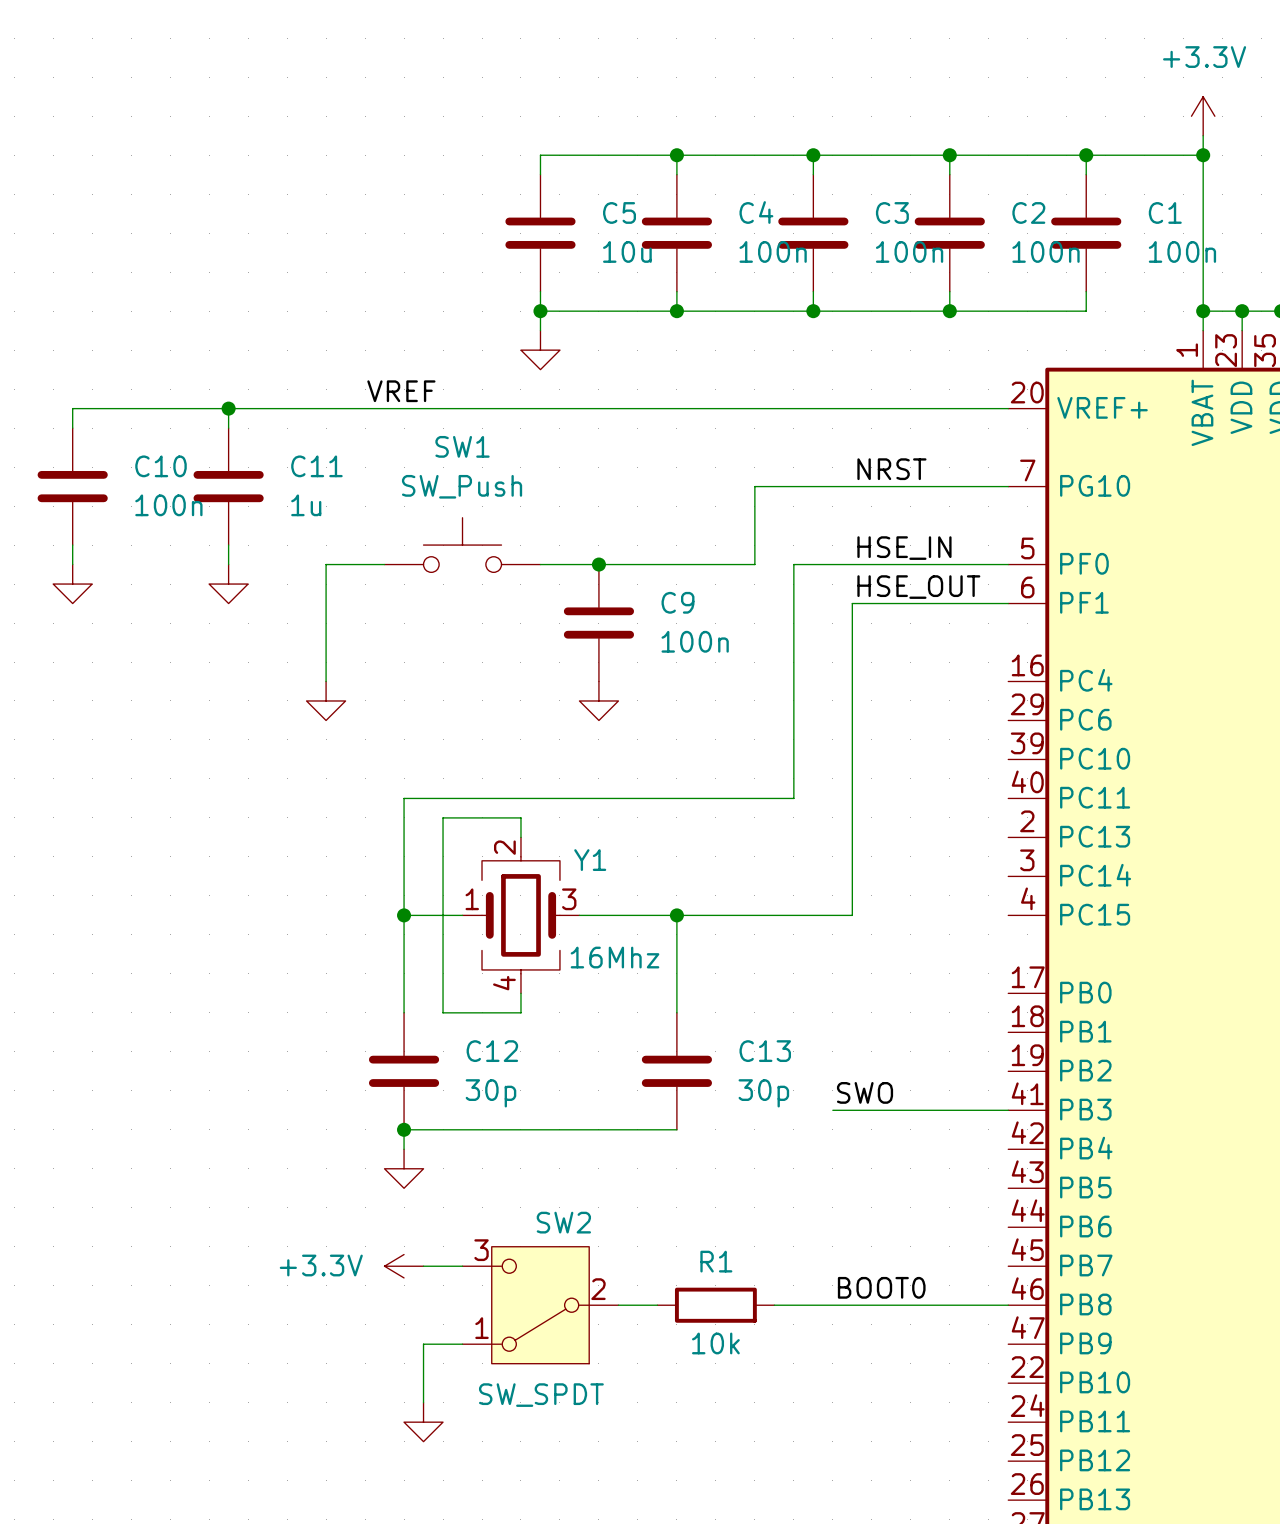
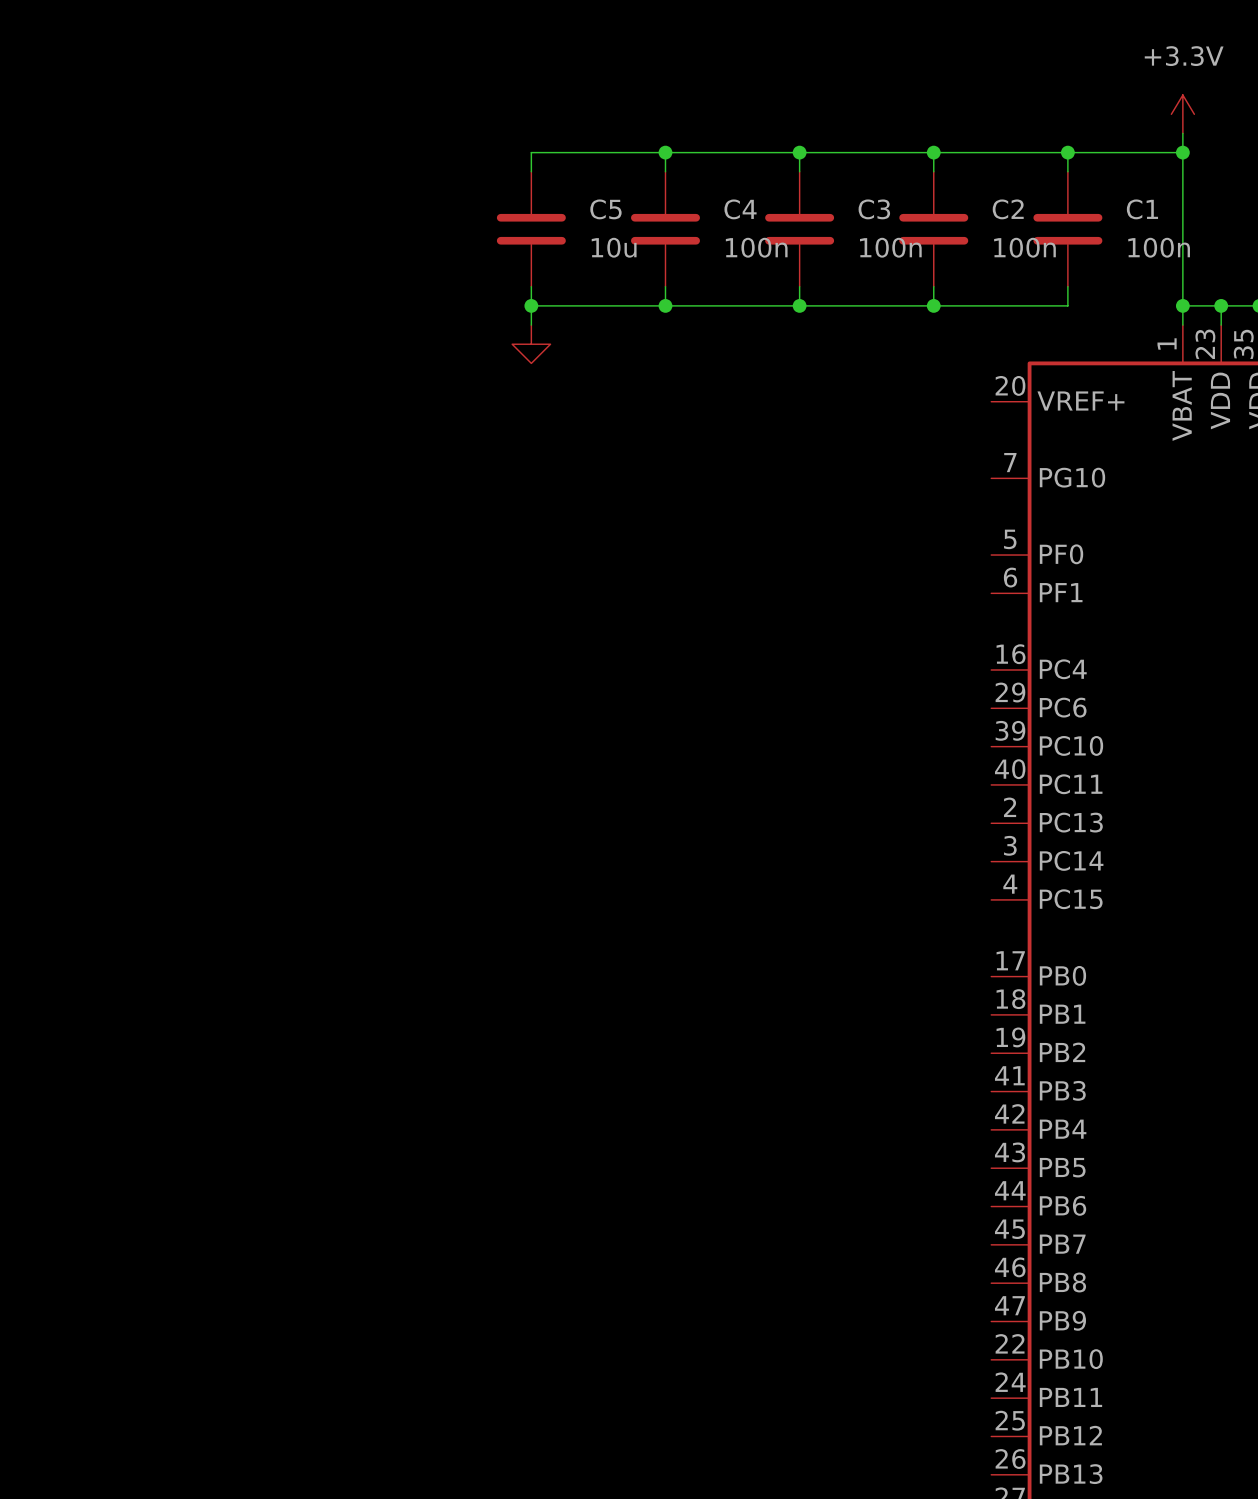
label: VREF (401, 391) -> none
wire: (228, 408) (228, 428) -> none
junction: (228, 408) -> none
wire: (1008, 408) (72, 408) (72, 428) -> none
label: NRST (891, 469) -> none
C10: 100n (72, 486) -> none
C11: 1u (228, 486) -> none
wire: (1008, 486) (754, 486) (754, 564) (540, 564) -> none
wire: (72, 545) (72, 564) -> none
wire: (228, 545) (228, 564) -> none
SW1: SW_Push (462, 545) -> none
label: HSE_IN (904, 548) -> none
wire: (384, 564) (326, 564) (326, 681) -> none
junction: (598, 564) -> none
wire: (1008, 564) (793, 564) (793, 798) (404, 798) (404, 1012) -> none
power symbol: (72, 584) -> none
power symbol: (228, 584) -> none
label: HSE_OUT (918, 587) -> none
wire: (1008, 603) (852, 603) (852, 915) (579, 915) -> none
C9: 100n (598, 623) -> none
power symbol: (326, 700) -> none
power symbol: (598, 700) -> none
wire: (520, 837) (520, 817) (443, 817) (443, 1012) (520, 1012) (520, 993) -> none
wire: (404, 915) (462, 915) -> none
junction: (404, 915) -> none
Y1: 16Mhz (520, 915) -> none
wire: (676, 915) (676, 1012) -> none
junction: (676, 915) -> none
C12: 30p (404, 1071) -> none
C13: 30p (676, 1071) -> none
label: SWO (865, 1092) -> none
wire: (832, 1110) (1008, 1110) -> none
junction: (404, 1129) -> none
wire: (676, 1129) (404, 1129) (404, 1149) -> none
power symbol: (404, 1168) -> none
power symbol: +3.3V (404, 1266) -> none
wire: (423, 1266) (462, 1266) -> none
label: BOOT0 (881, 1287) -> none
SW2: SW_SPDT (540, 1305) -> none
wire: (618, 1305) (657, 1305) -> none
R1: 10k (715, 1305) -> none
wire: (774, 1305) (1008, 1305) -> none
wire: (462, 1344) (423, 1344) (423, 1402) -> none
power symbol: (423, 1422) -> none

